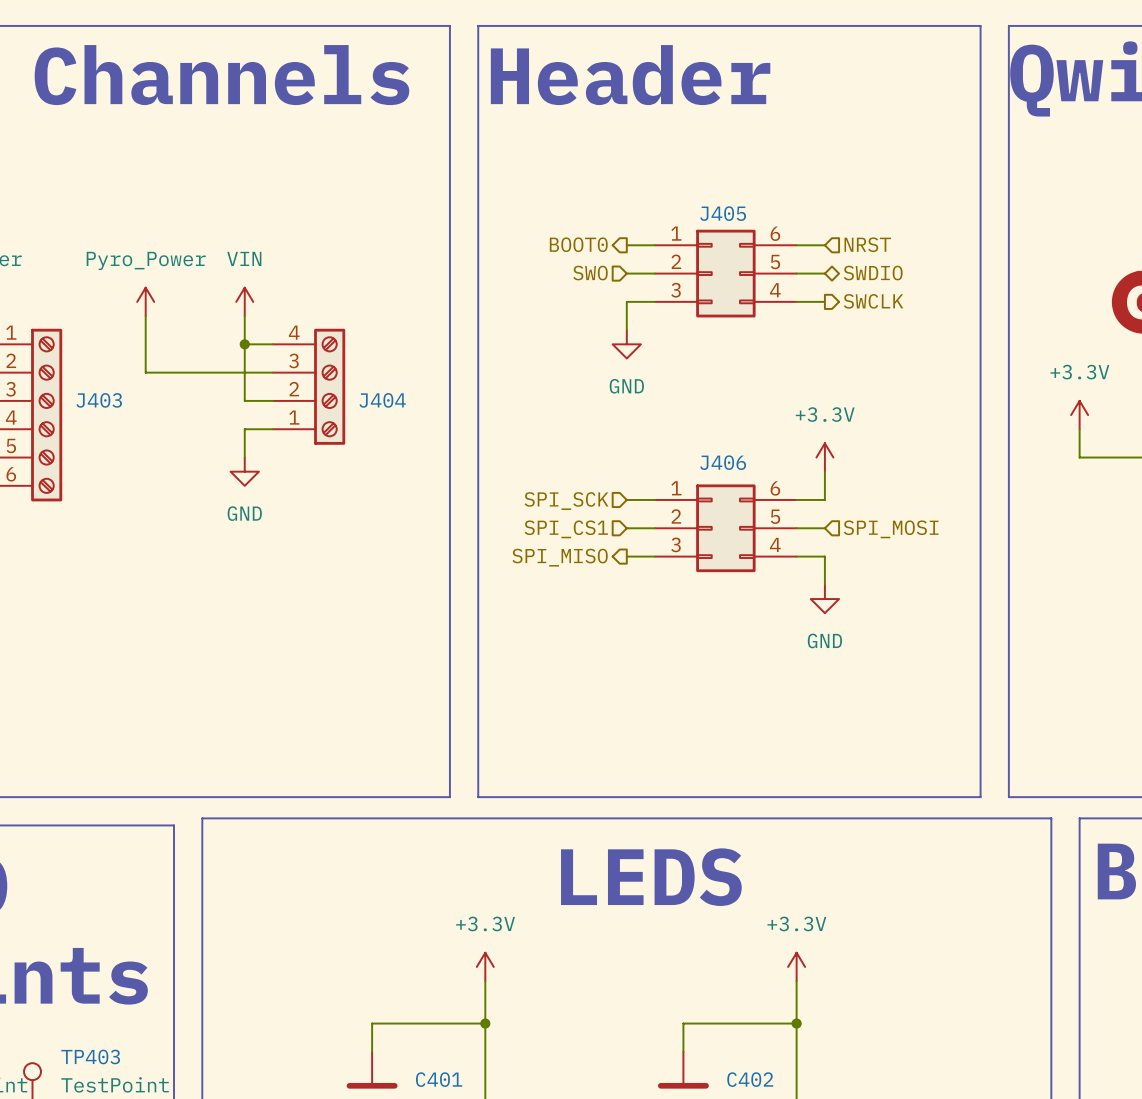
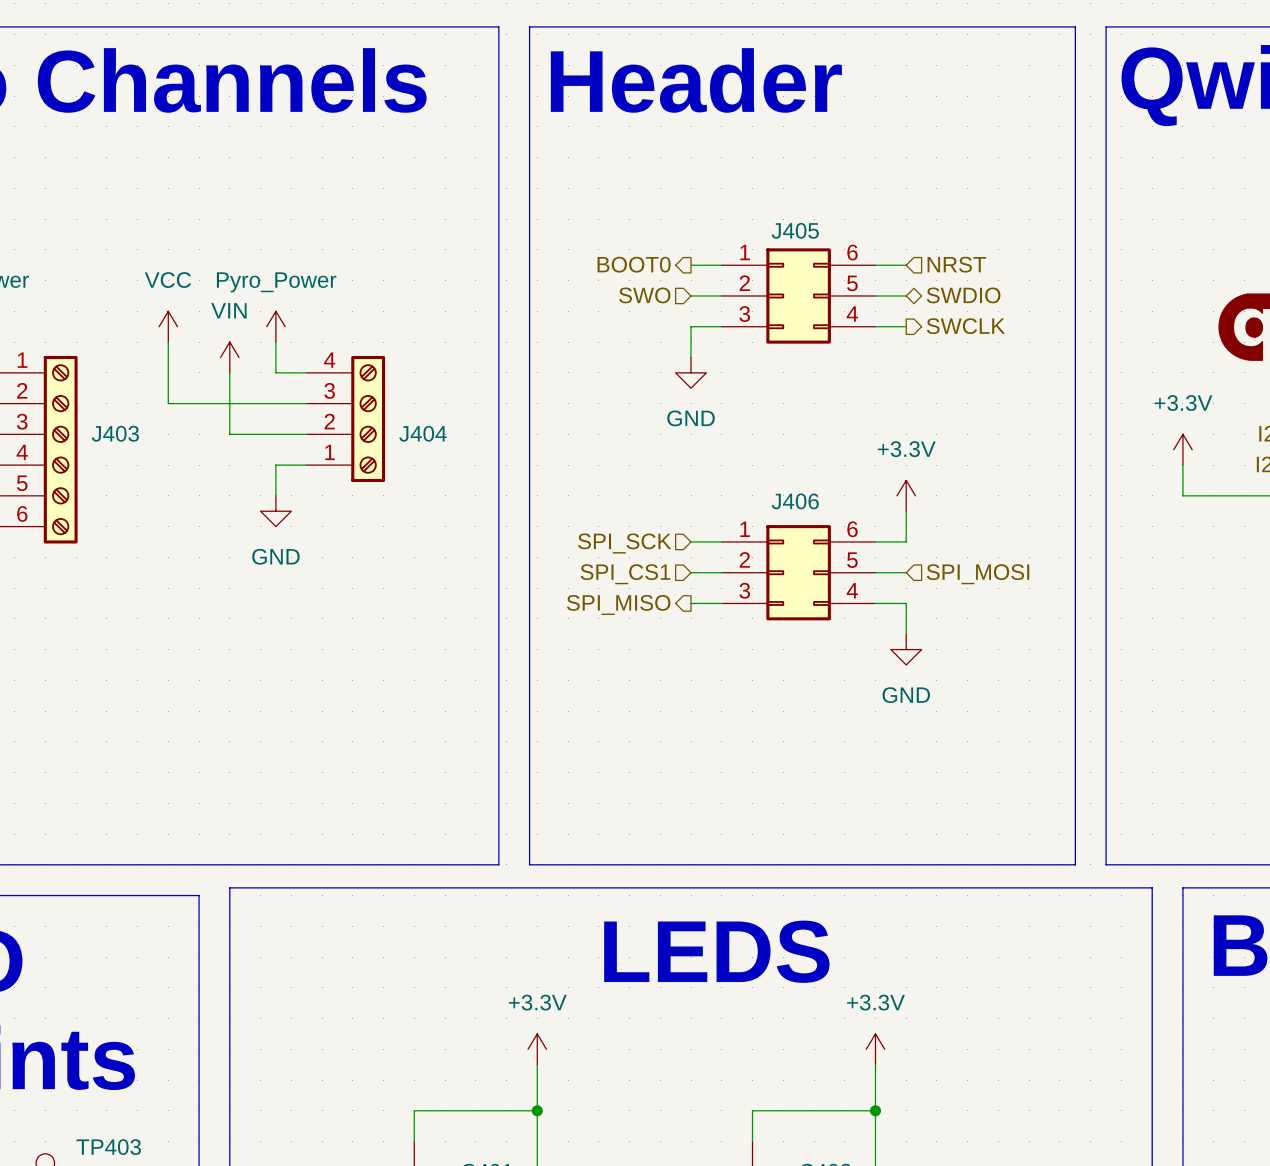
power symbol: Pyro_Power (145, 301) -> VCC (168, 326)
power symbol: VIN (244, 301) -> Pyro_Power (275, 326)
power symbol: none -> VIN (229, 357)
wire: (244, 344) (244, 400) -> (229, 372) (229, 434) (275, 434)
junction: (244, 344) -> none

